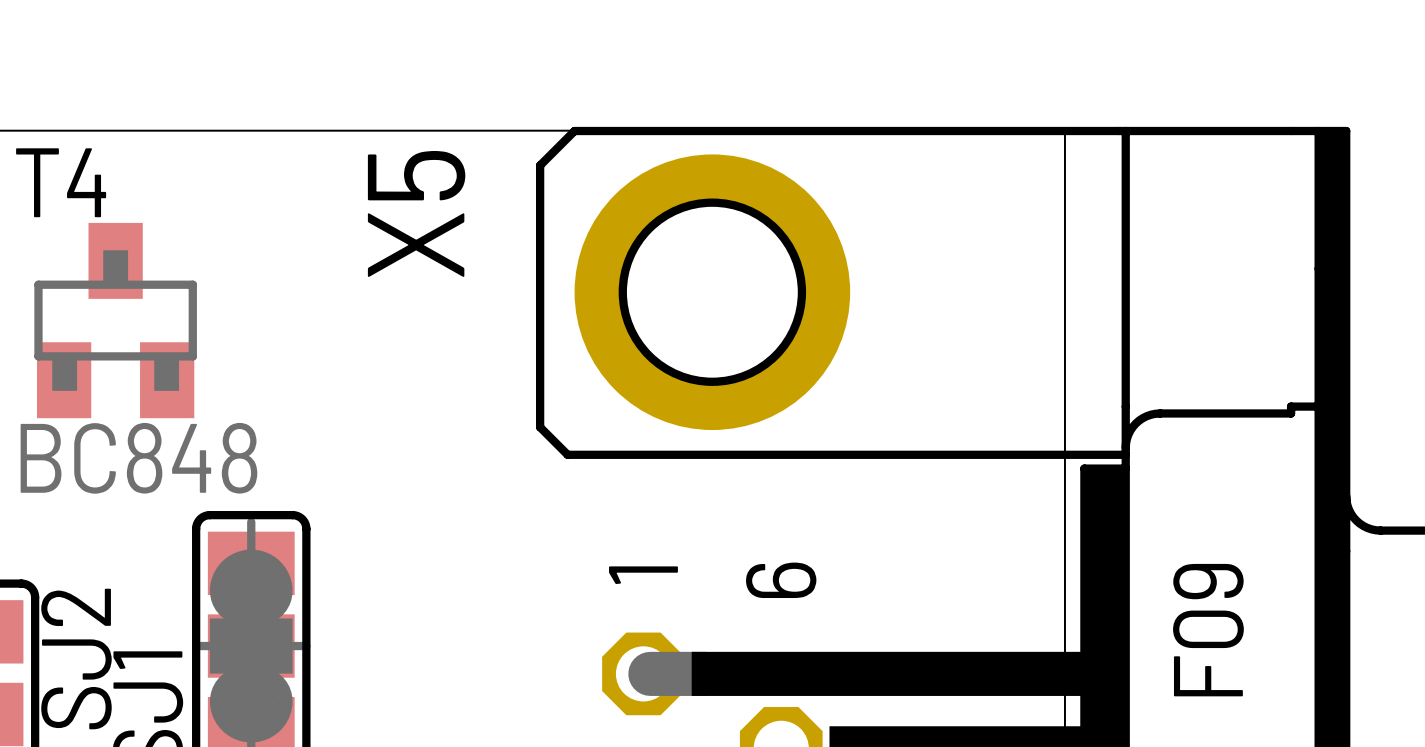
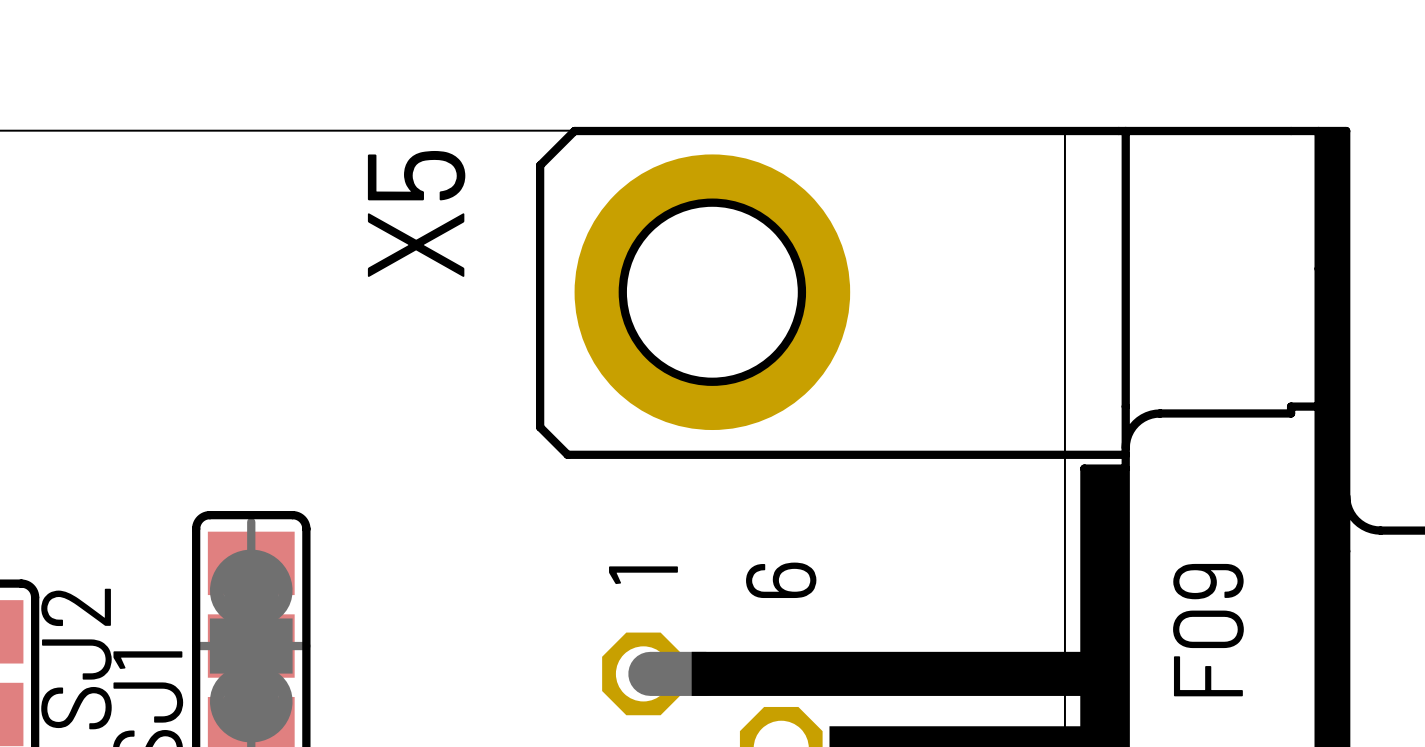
T4: BC848 (115, 320) -> none

